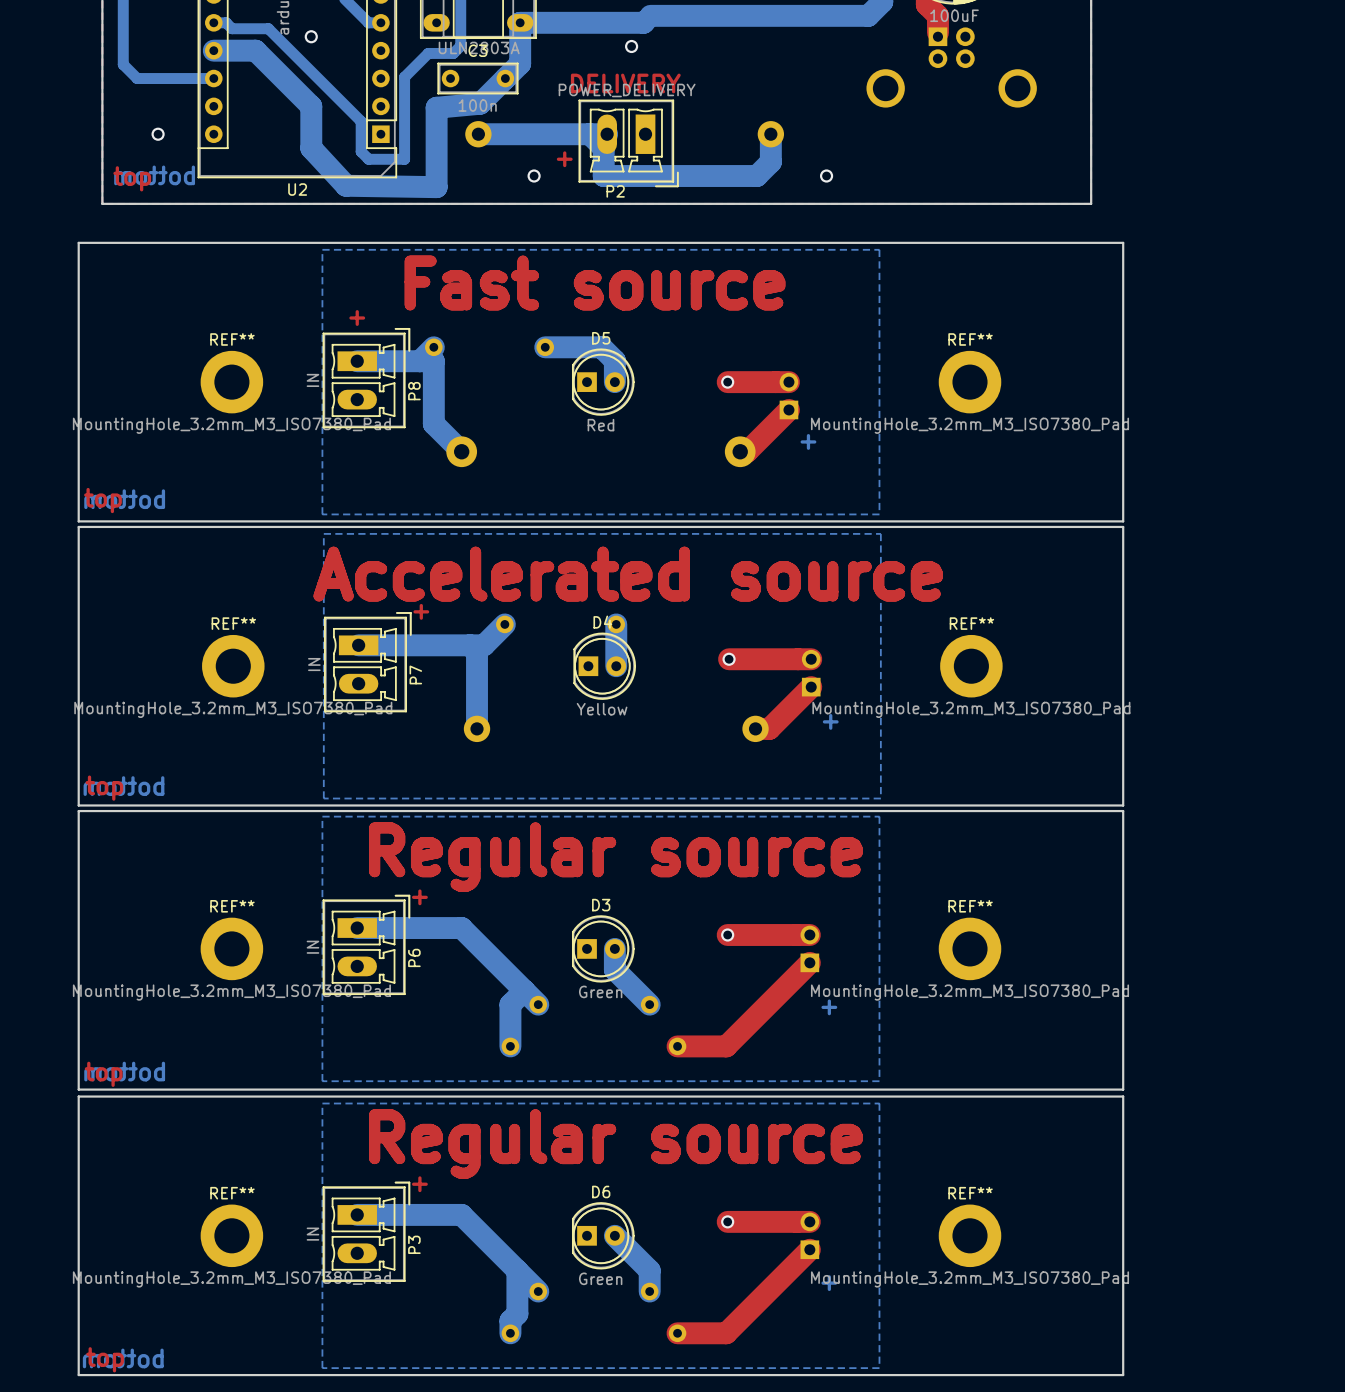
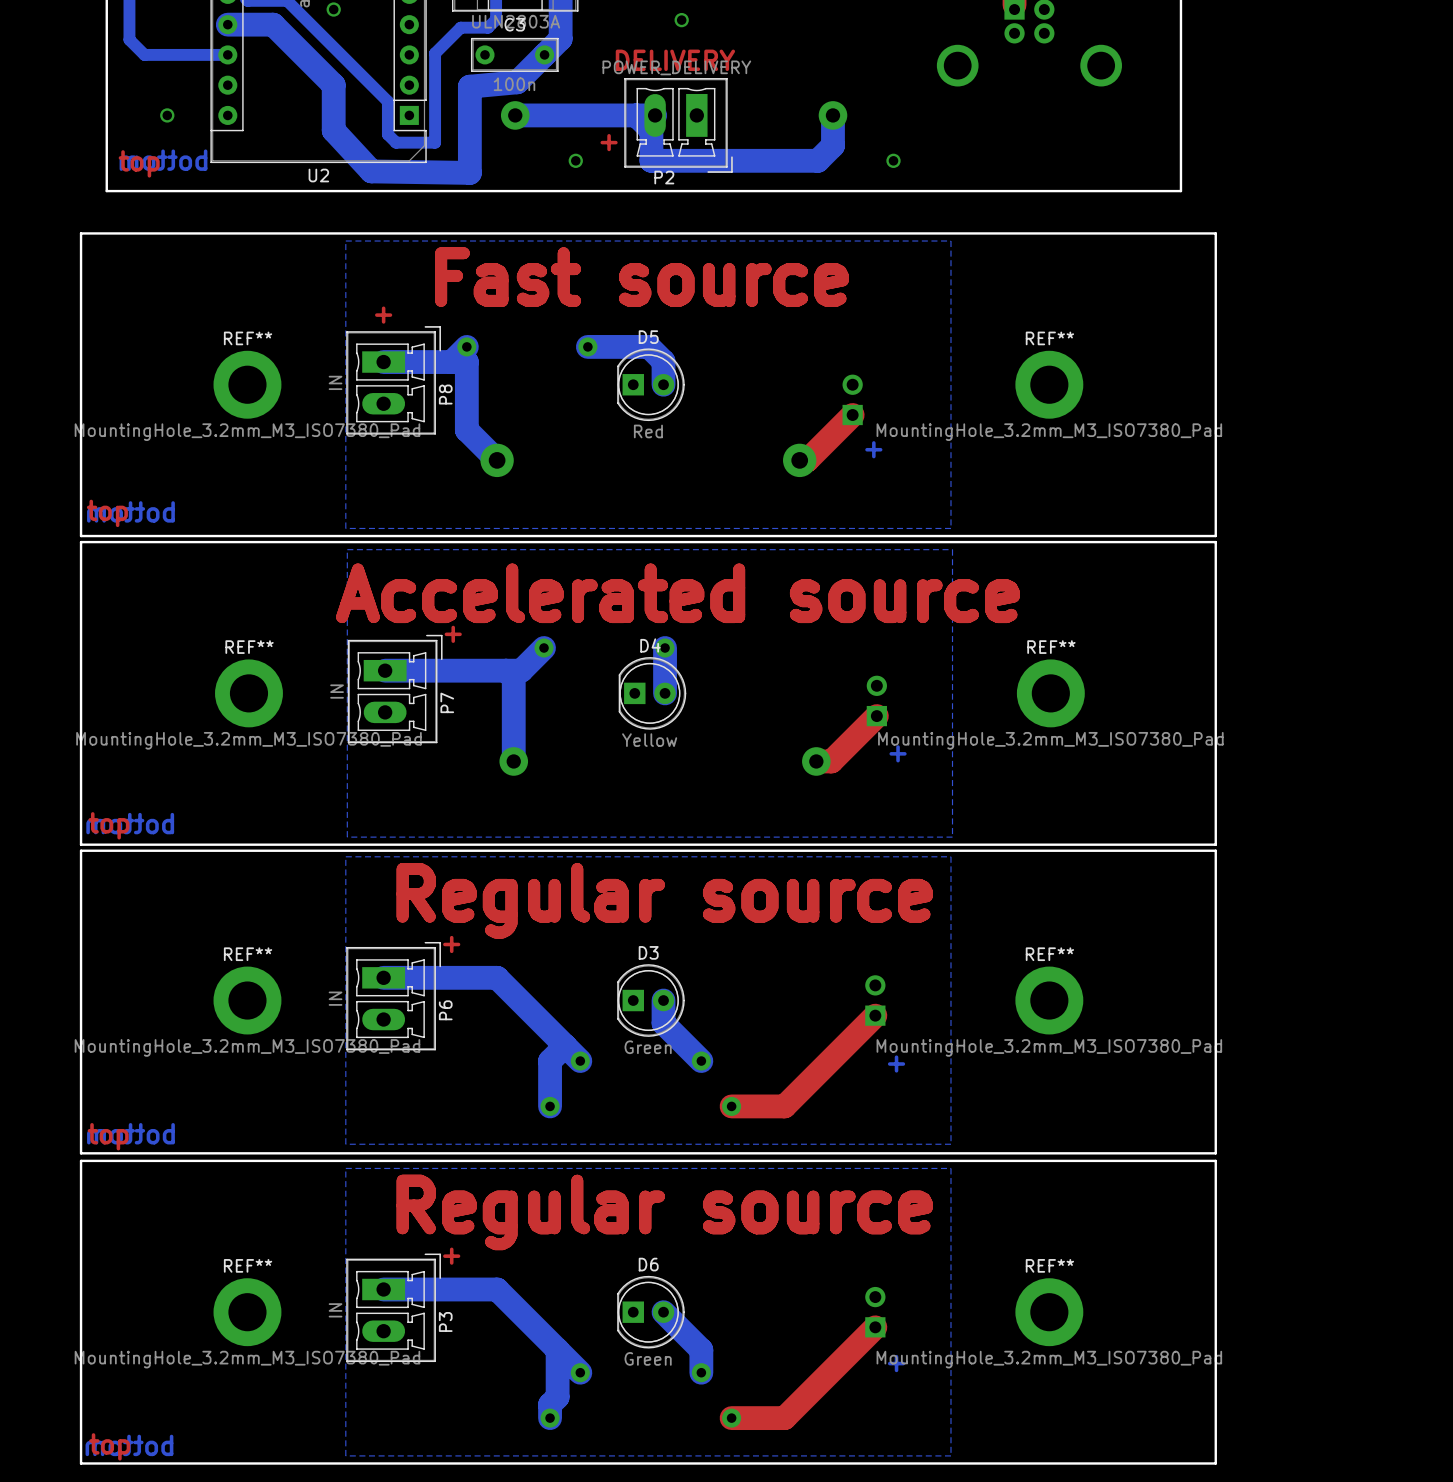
top track: (727, 382) (788, 382) -> none
via: (727, 382) -> none
top track: (729, 659) (811, 659) -> none
via: (729, 659) -> none
top track: (727, 935) (809, 935) -> none
via: (727, 935) -> none
top track: (727, 1221) (809, 1221) -> none
via: (727, 1221) -> none

